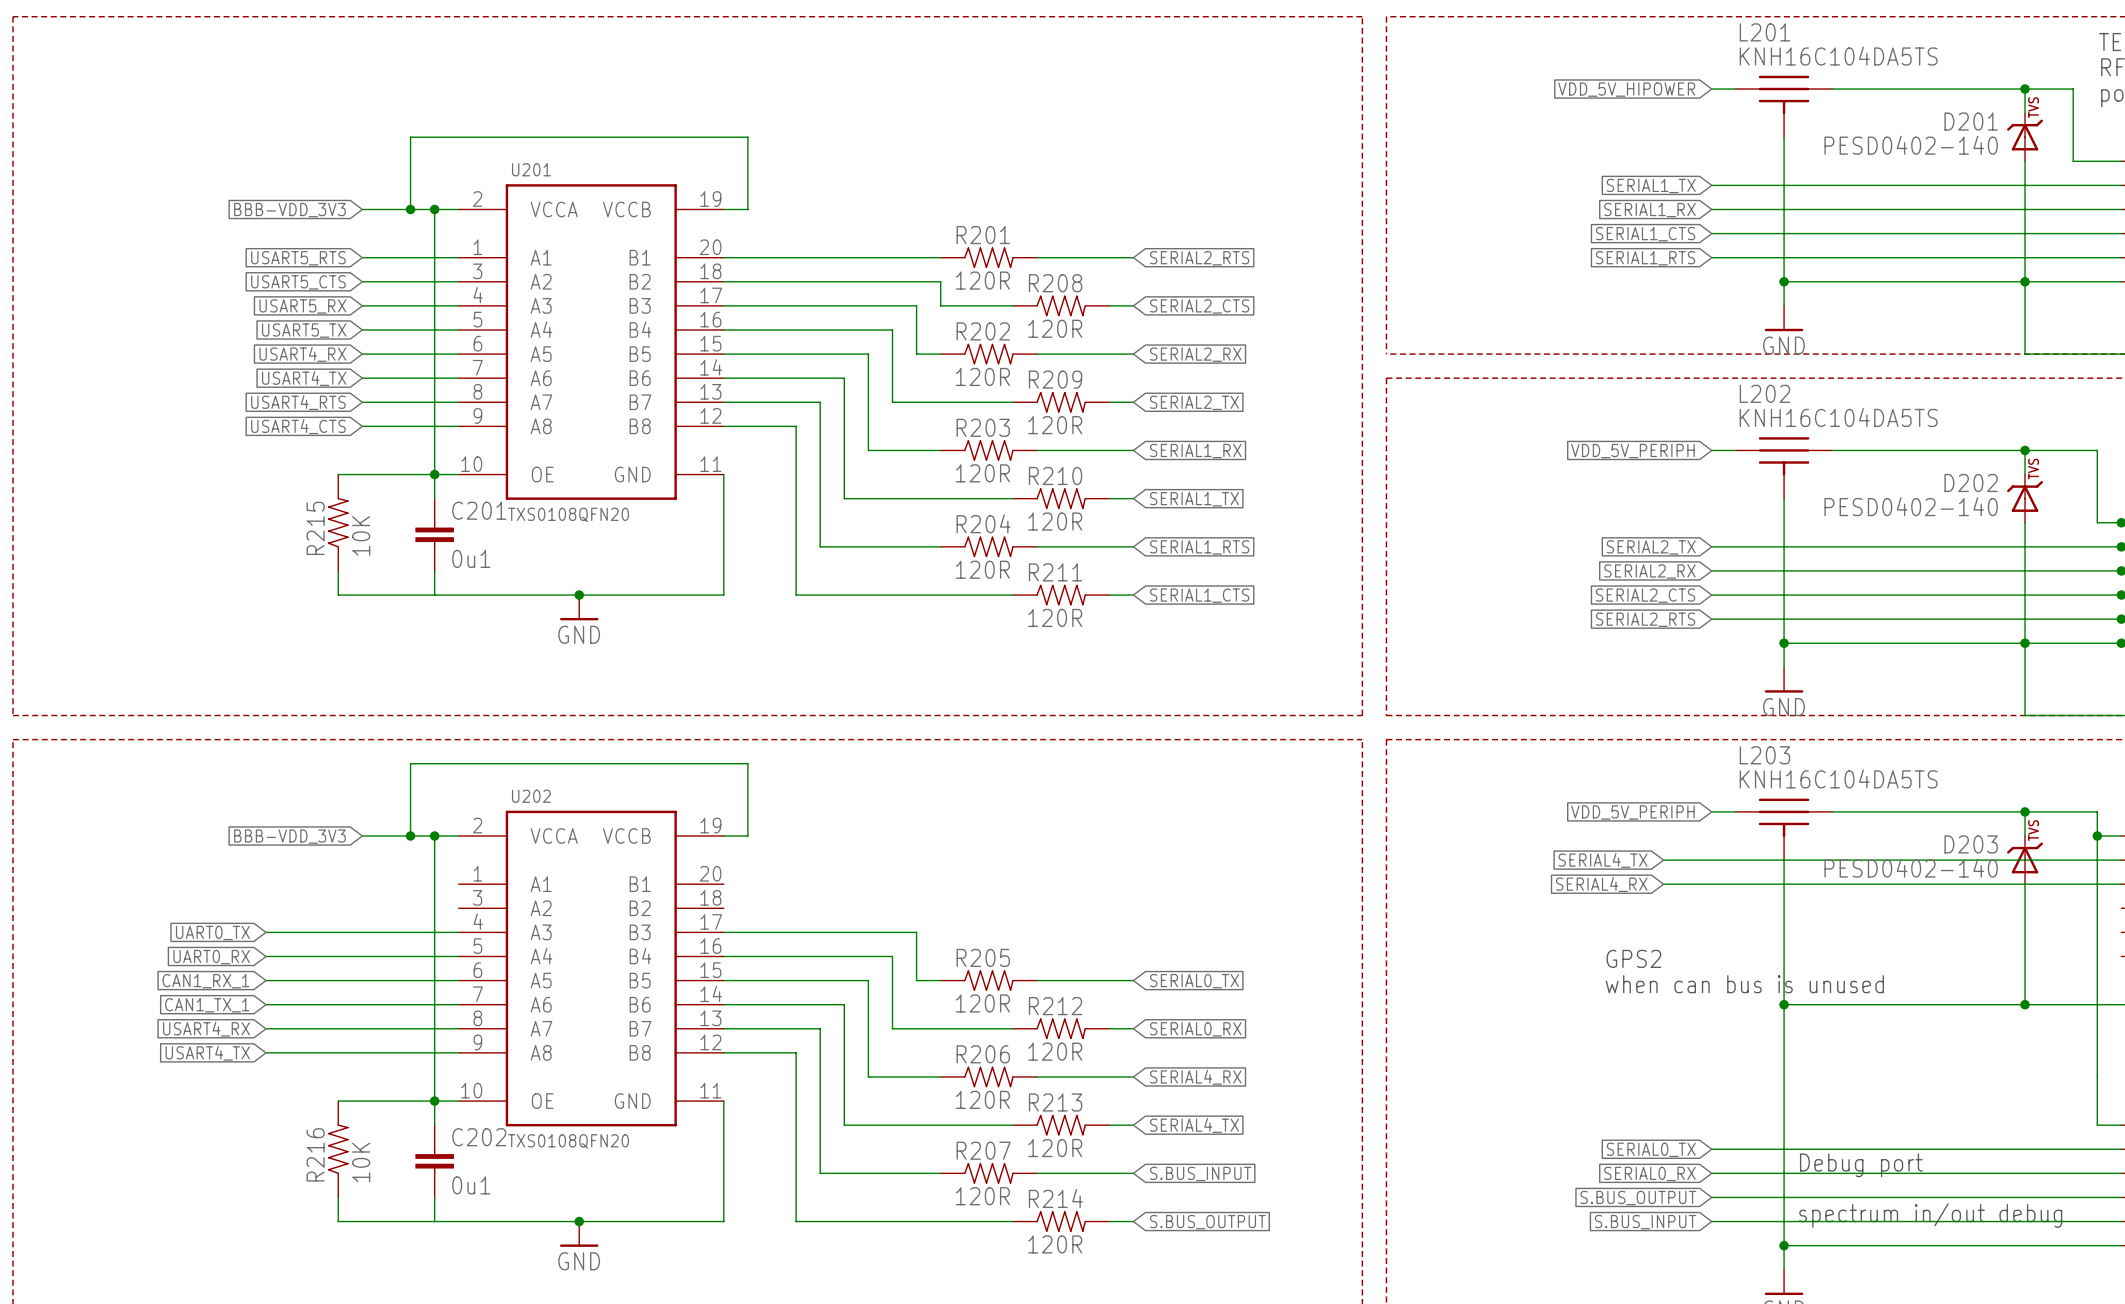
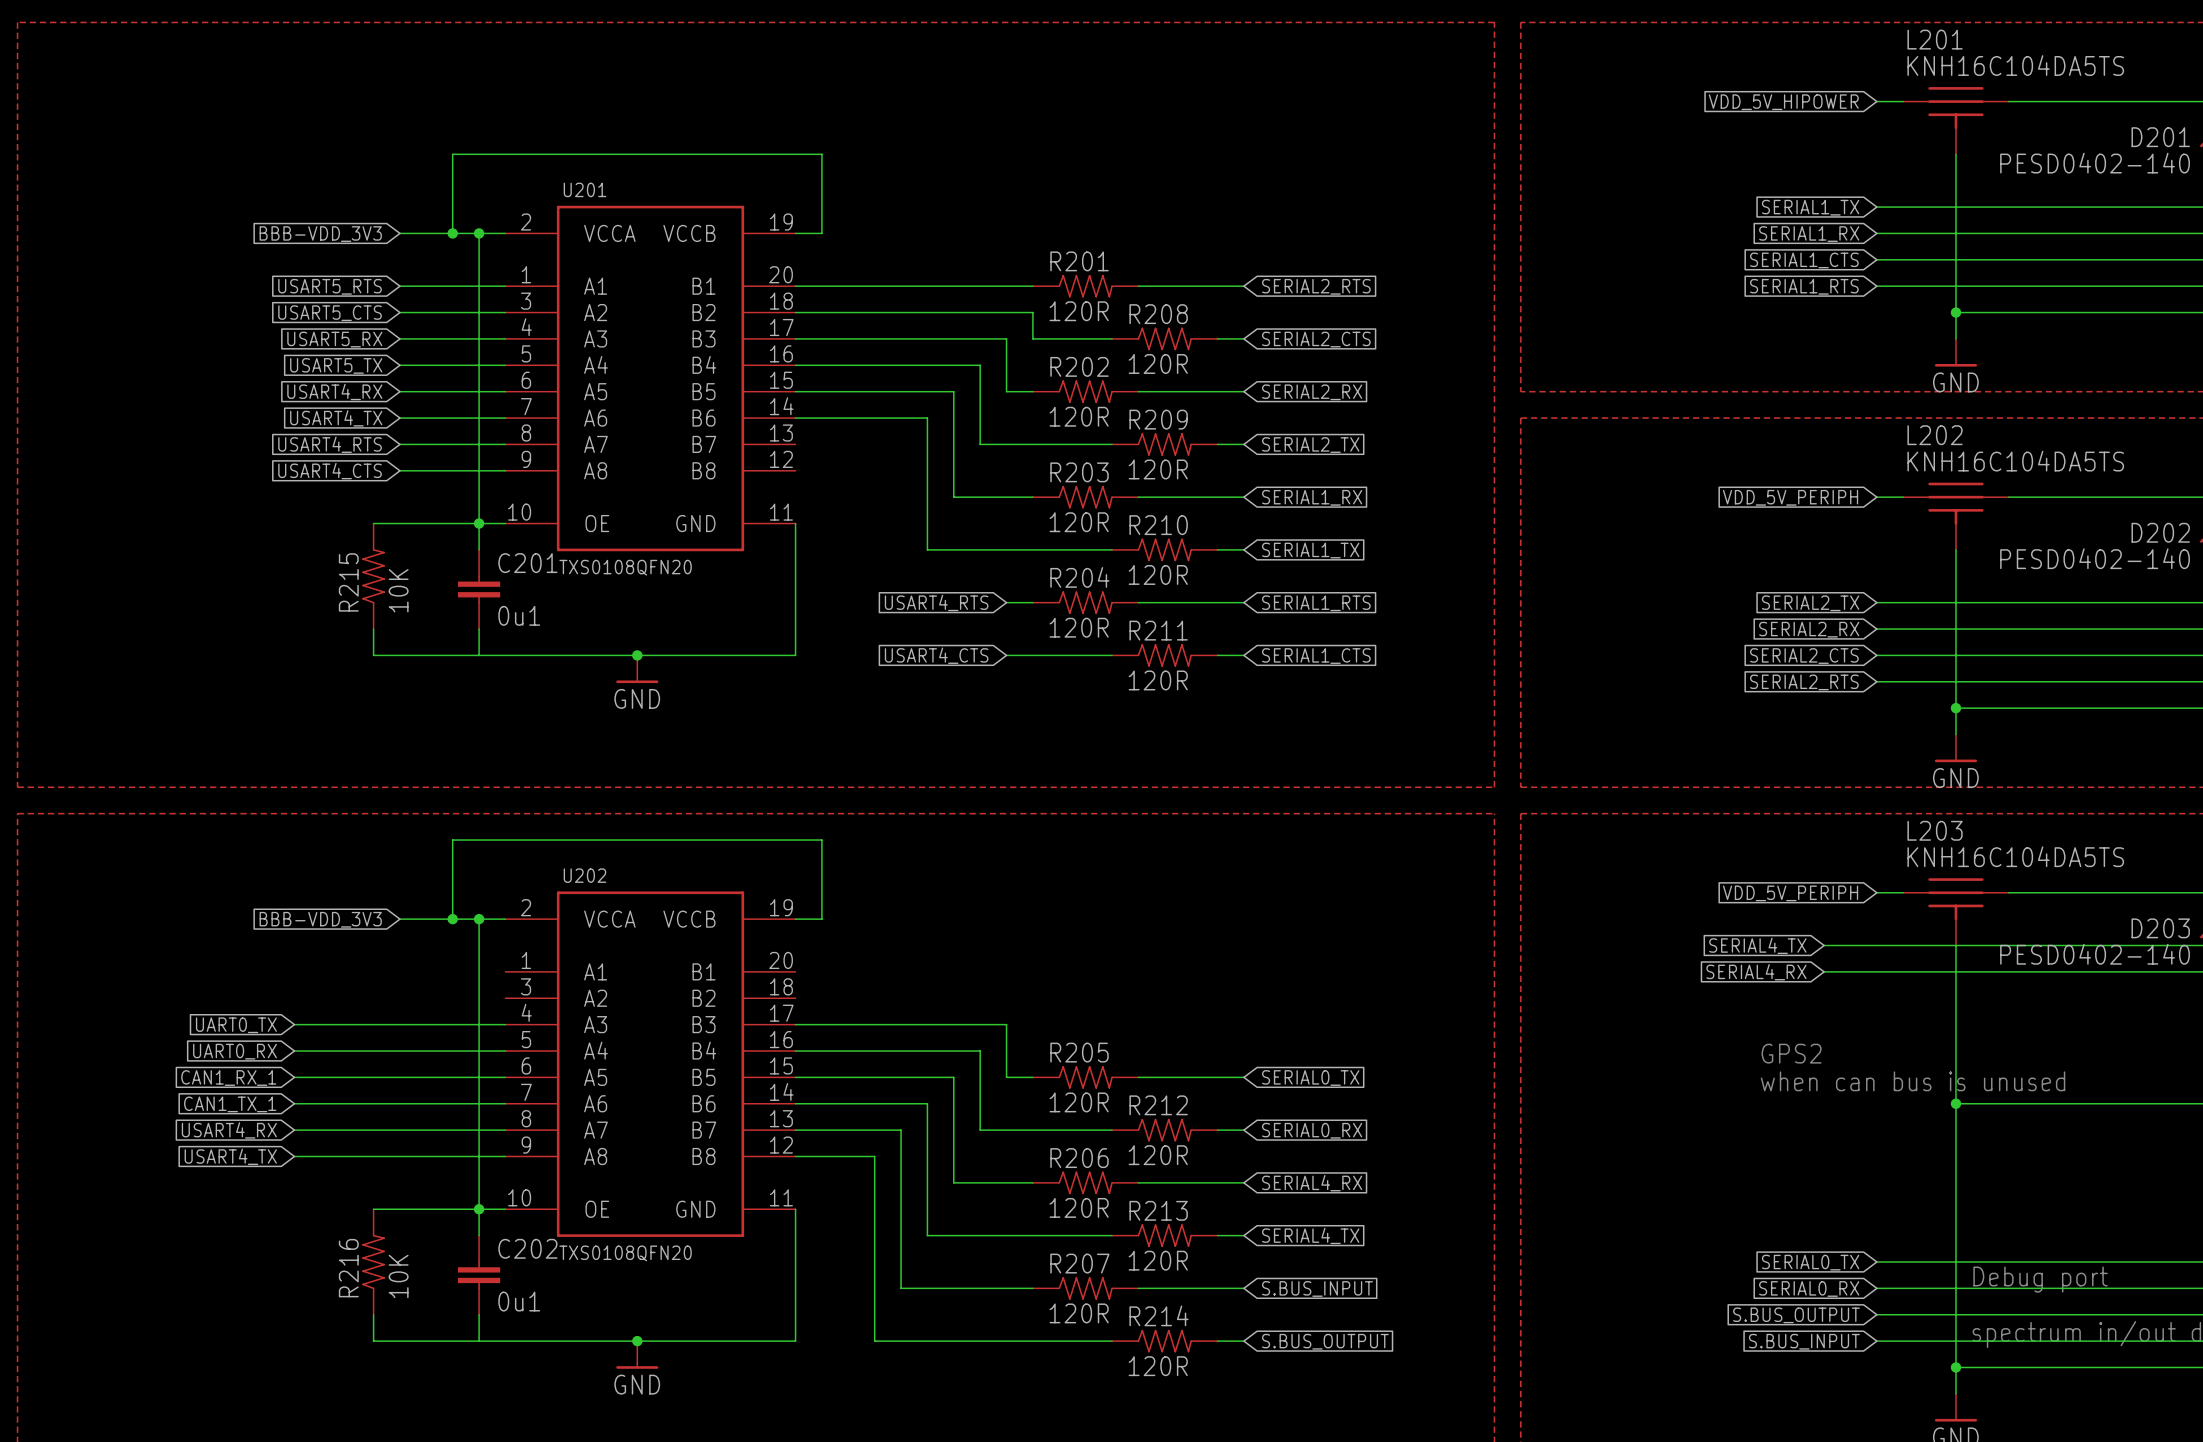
wire: (723, 402) (820, 402) (820, 546) (916, 546) -> none
wire: (723, 426) (796, 426) (796, 595) (916, 595) -> none
global label: none -> USART4_RTS (936, 602)
global label: none -> USART4_CTS (936, 655)

